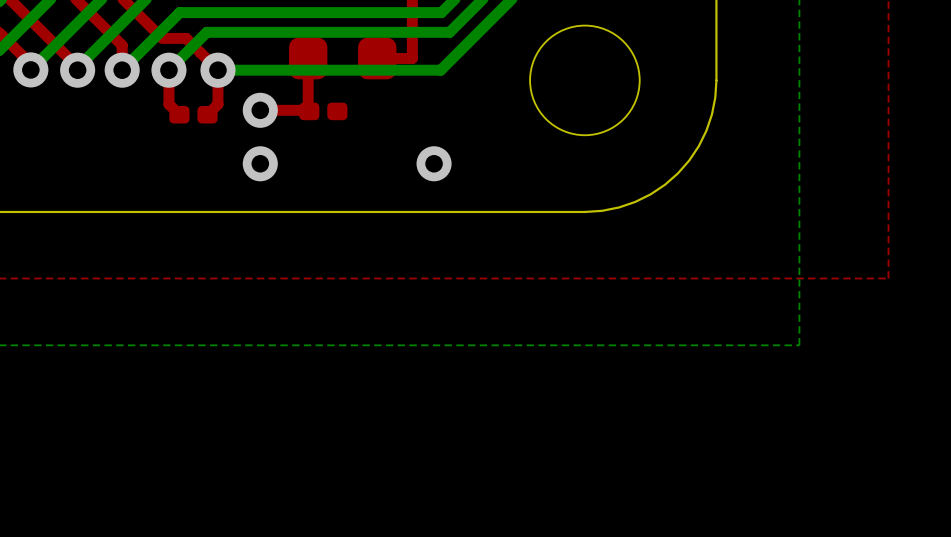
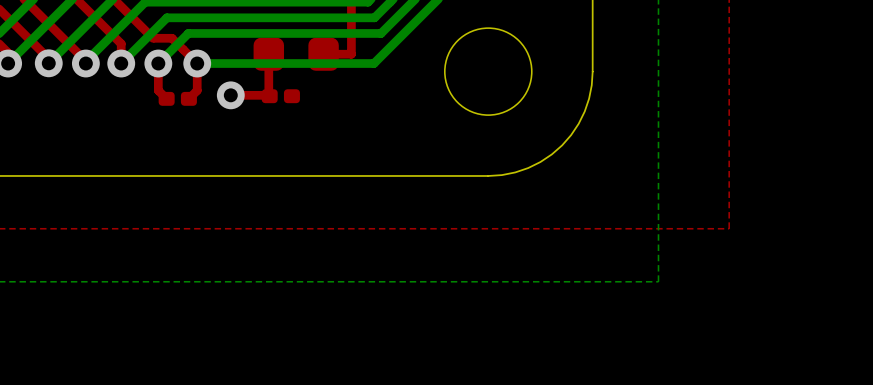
via: (260, 163) -> none
via: (434, 163) -> none

